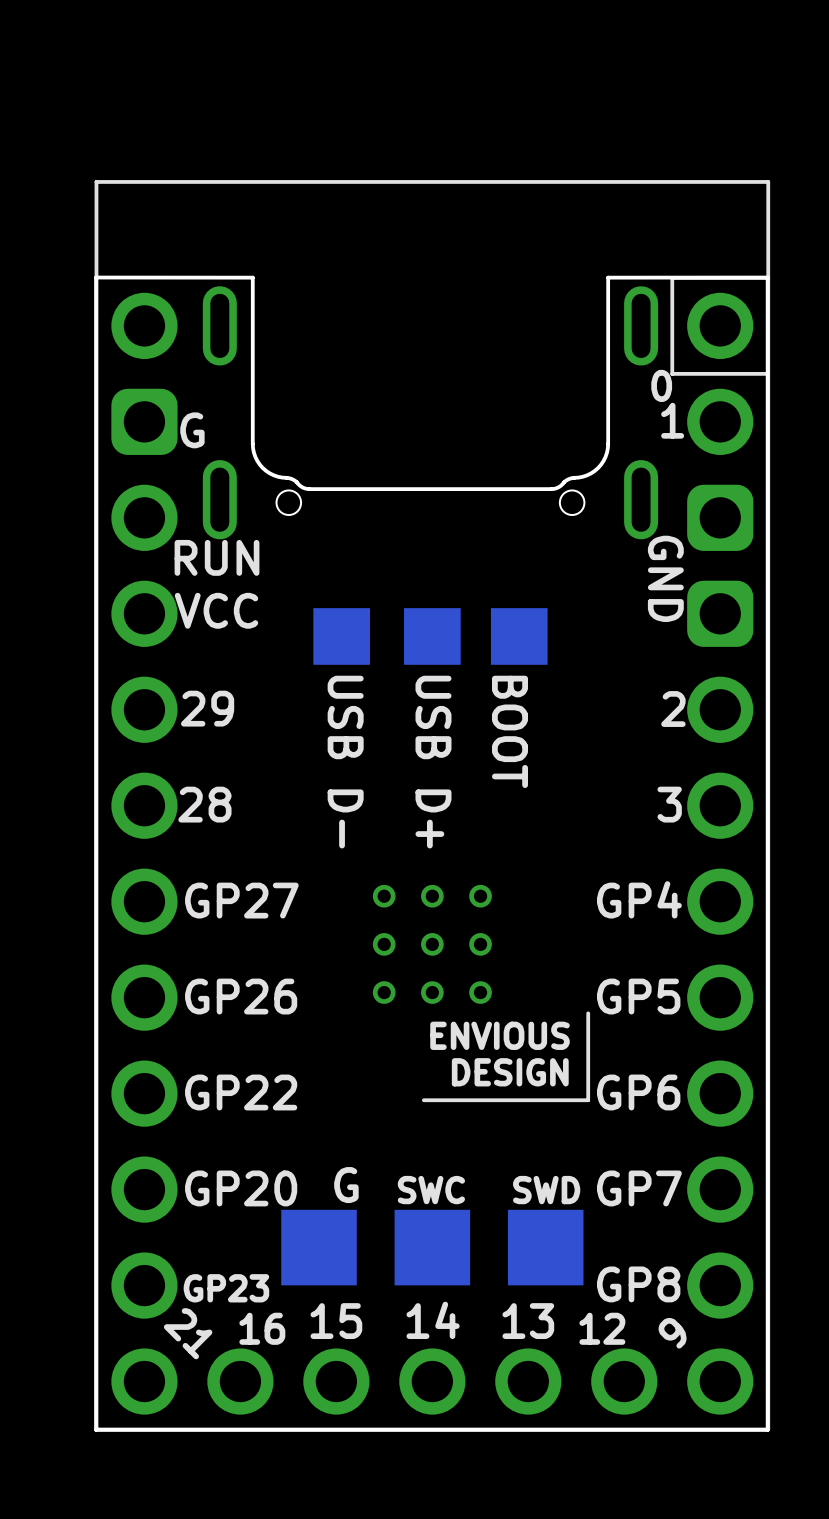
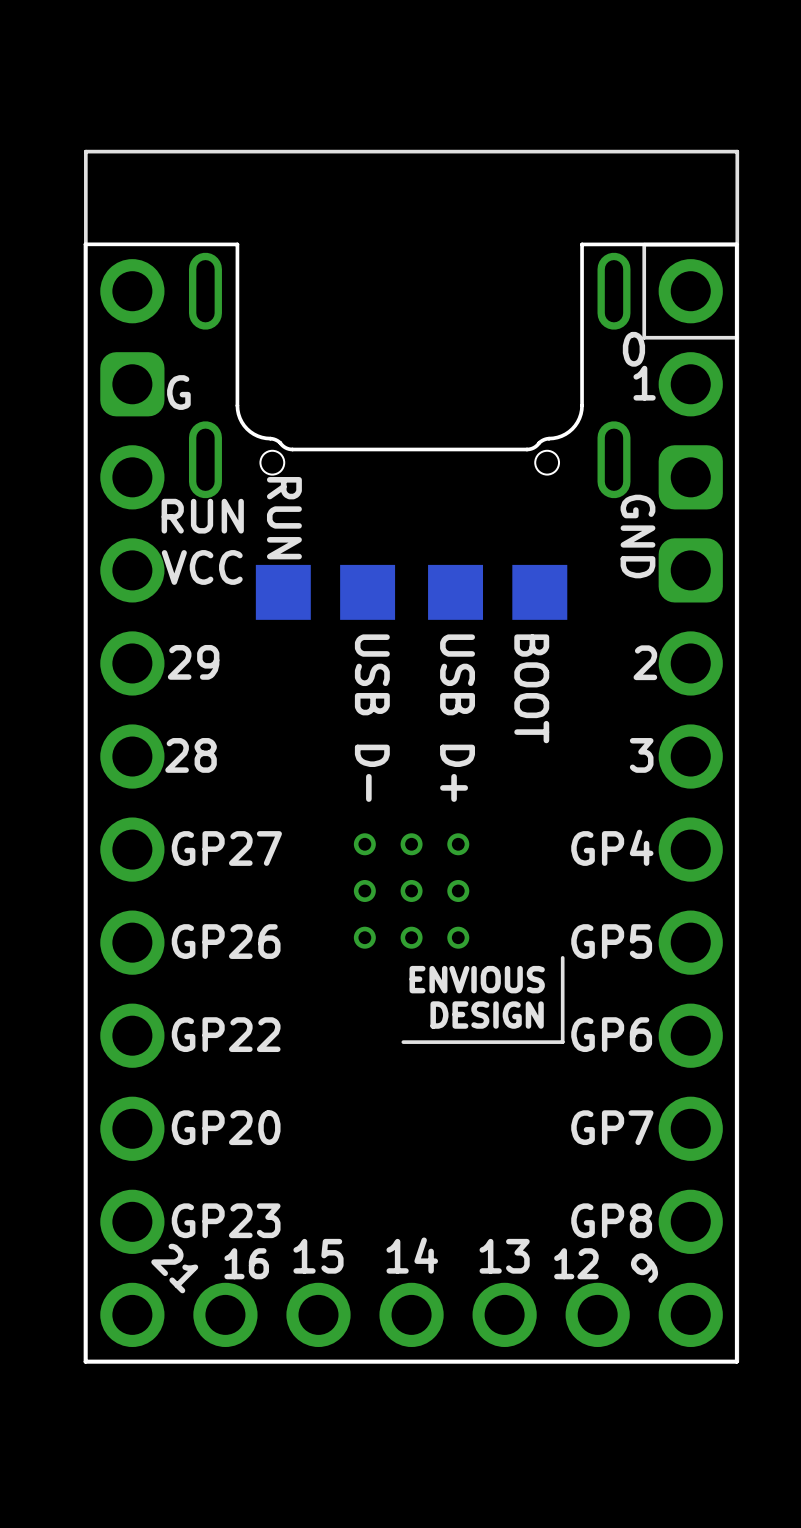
part footprint: [94, 180, 771, 1432] -> [84, 149, 740, 1364]
text: none -> RUN (284, 518)
part: none -> (283, 592)
part: (341, 636) -> none
part: none -> (367, 592)
part: (432, 636) -> none
part: none -> (455, 592)
part: (519, 636) -> none
part: none -> (539, 592)
text position: BOOT (509, 731) -> BOOT (531, 688)
text position: USB D- (345, 762) -> USB D- (372, 718)
text position: USB D+ (433, 762) -> USB D+ (457, 718)
text: G (346, 1185) -> none
text: SWC (431, 1190) -> none
text: SWD (546, 1190) -> none
part: (319, 1247) -> none
part: (432, 1247) -> none
part: (545, 1247) -> none

